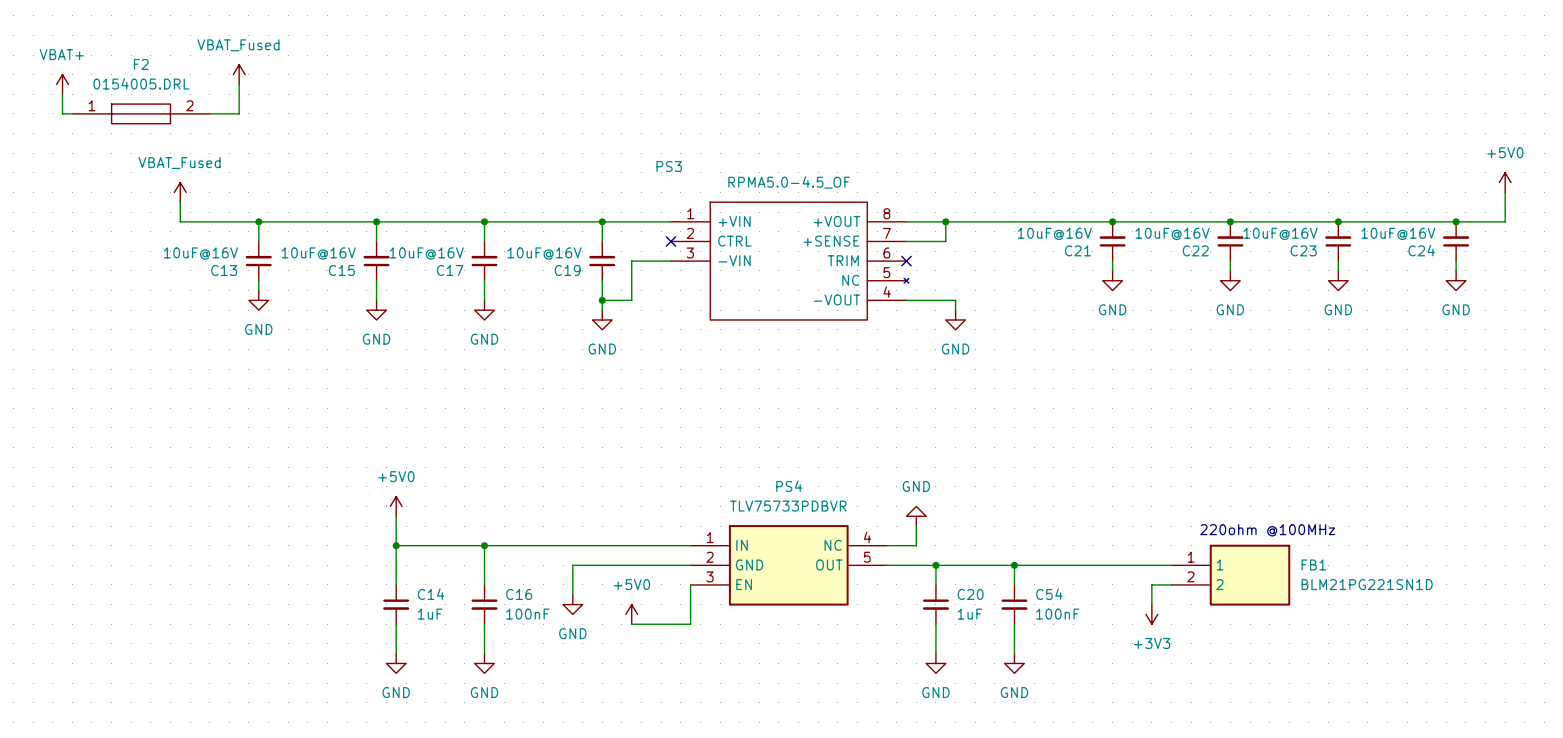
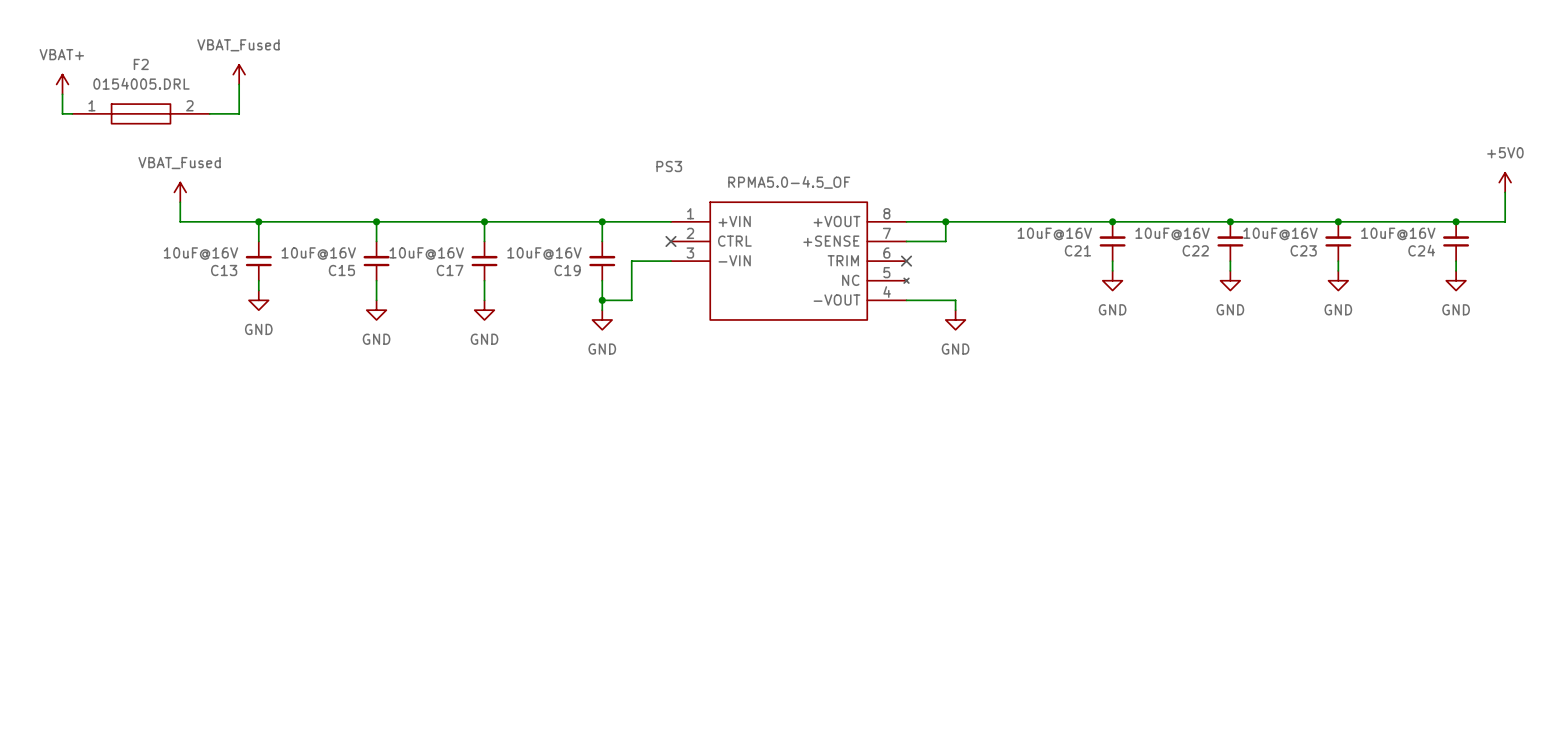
power symbol: +5V0 (396, 506) -> none
wire: (396, 516) (396, 584) -> none
power symbol: GND (916, 516) -> none
wire: (916, 526) (916, 545) (886, 545) -> none
text: 220ohm @100MHz (1267, 530) -> none
wire: (396, 545) (690, 545) -> none
junction: (396, 545) -> none
wire: (484, 545) (484, 584) -> none
junction: (484, 545) -> none
wire: (690, 565) (572, 565) (572, 594) -> none
PS4: TLV75733PDBVR (788, 565) -> none
wire: (886, 565) (1171, 565) -> none
wire: (935, 565) (935, 584) -> none
junction: (935, 565) -> none
wire: (1014, 565) (1014, 584) -> none
junction: (1014, 565) -> none
FB1: BLM21PG221SN1D (1230, 575) -> none
wire: (690, 584) (690, 624) (631, 624) -> none
wire: (1171, 584) (1151, 584) (1151, 604) -> none
C14: 1uF (396, 604) -> none
C16: 100nF (484, 604) -> none
power symbol: GND (572, 604) -> none
C20: 1uF (935, 604) -> none
C54: 100nF (1014, 604) -> none
power symbol: +5V0 (631, 614) -> none
power symbol: +3V3 (1151, 614) -> none
wire: (396, 624) (396, 653) -> none
wire: (484, 624) (484, 653) -> none
wire: (935, 624) (935, 653) -> none
wire: (1014, 624) (1014, 653) -> none
power symbol: GND (396, 663) -> none
power symbol: GND (484, 663) -> none
power symbol: GND (935, 663) -> none
power symbol: GND (1014, 663) -> none

